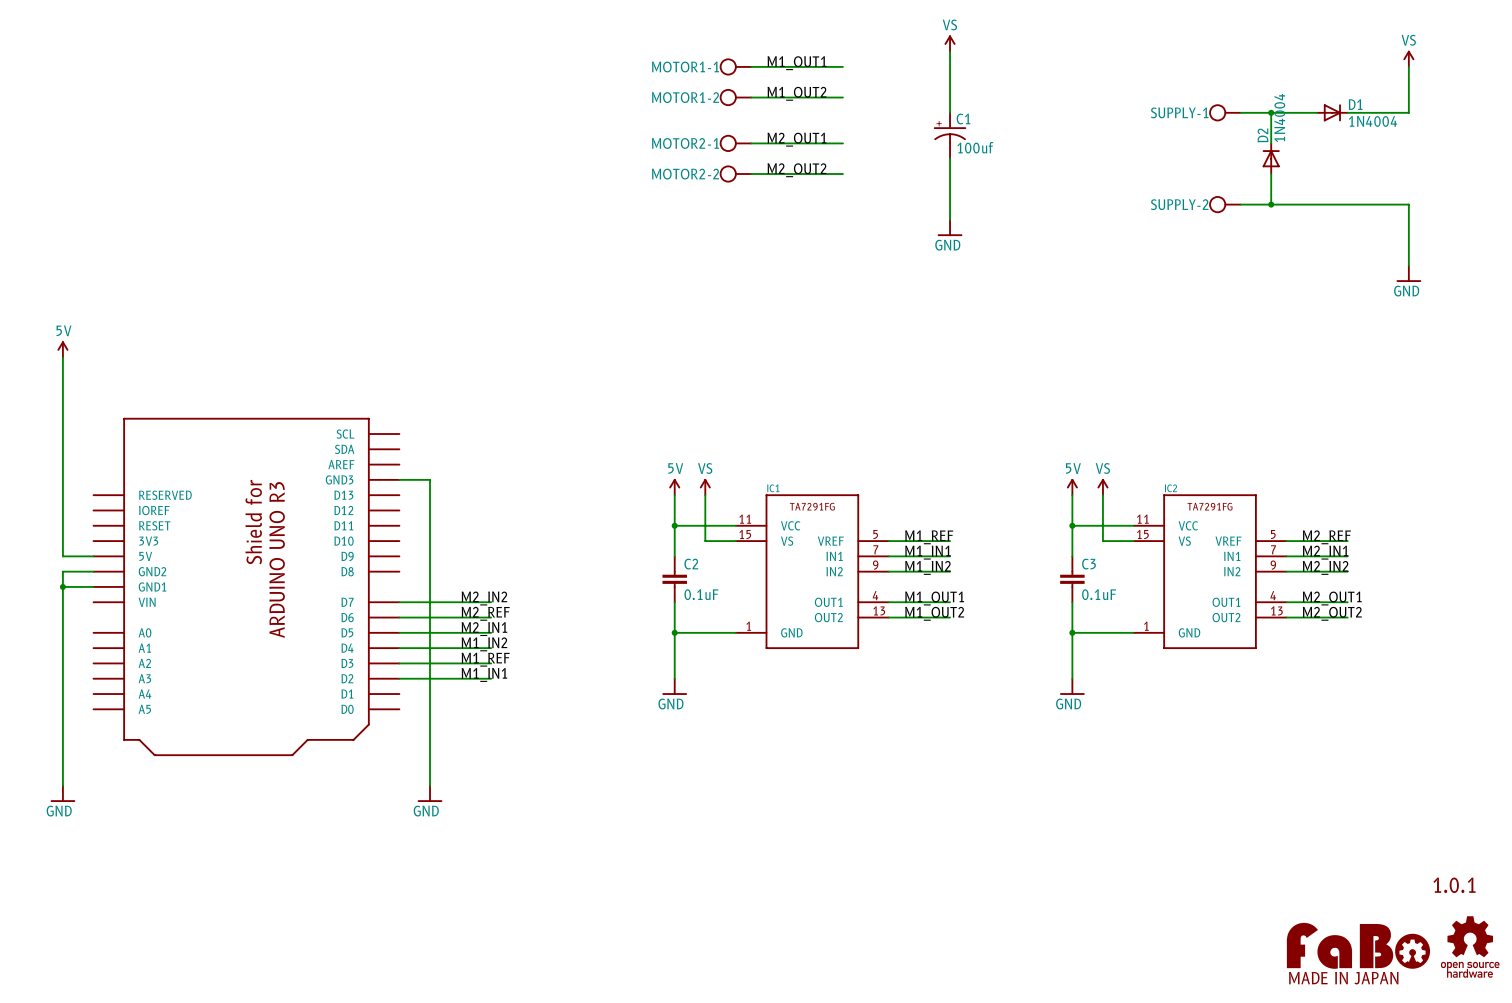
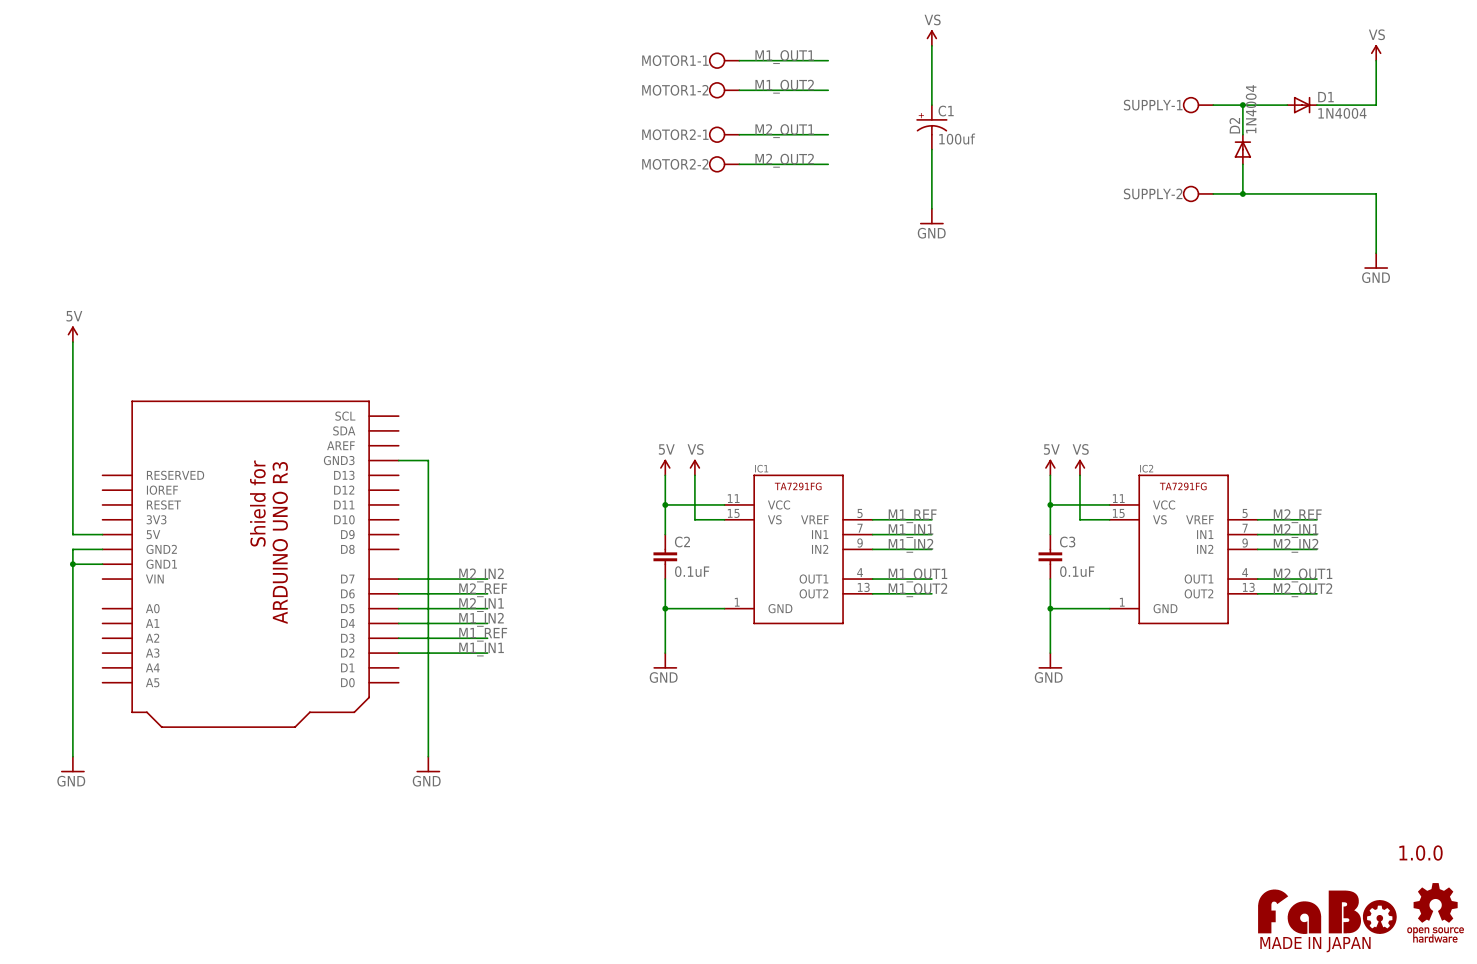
text: 1.0.1 (1454, 885) -> 1.0.0 (1421, 853)

